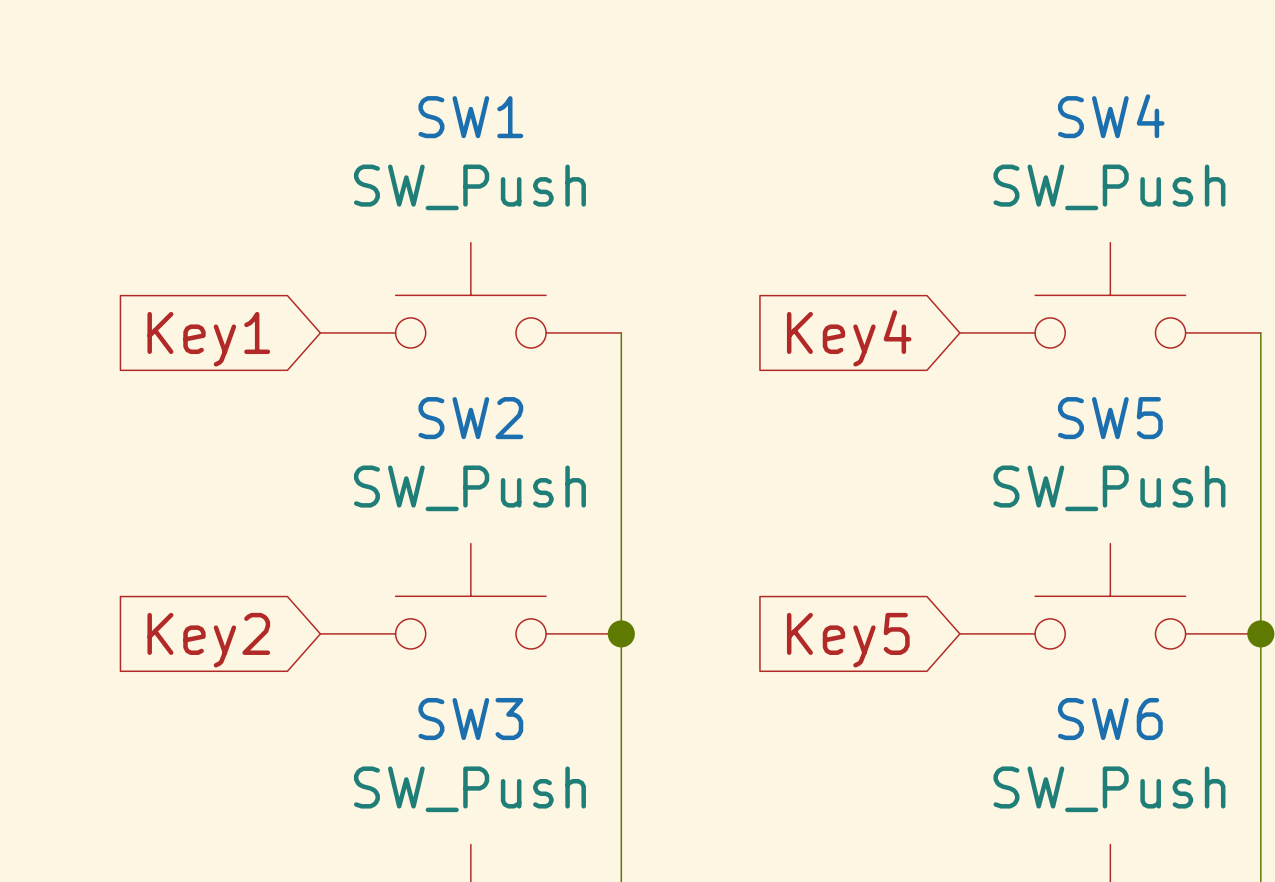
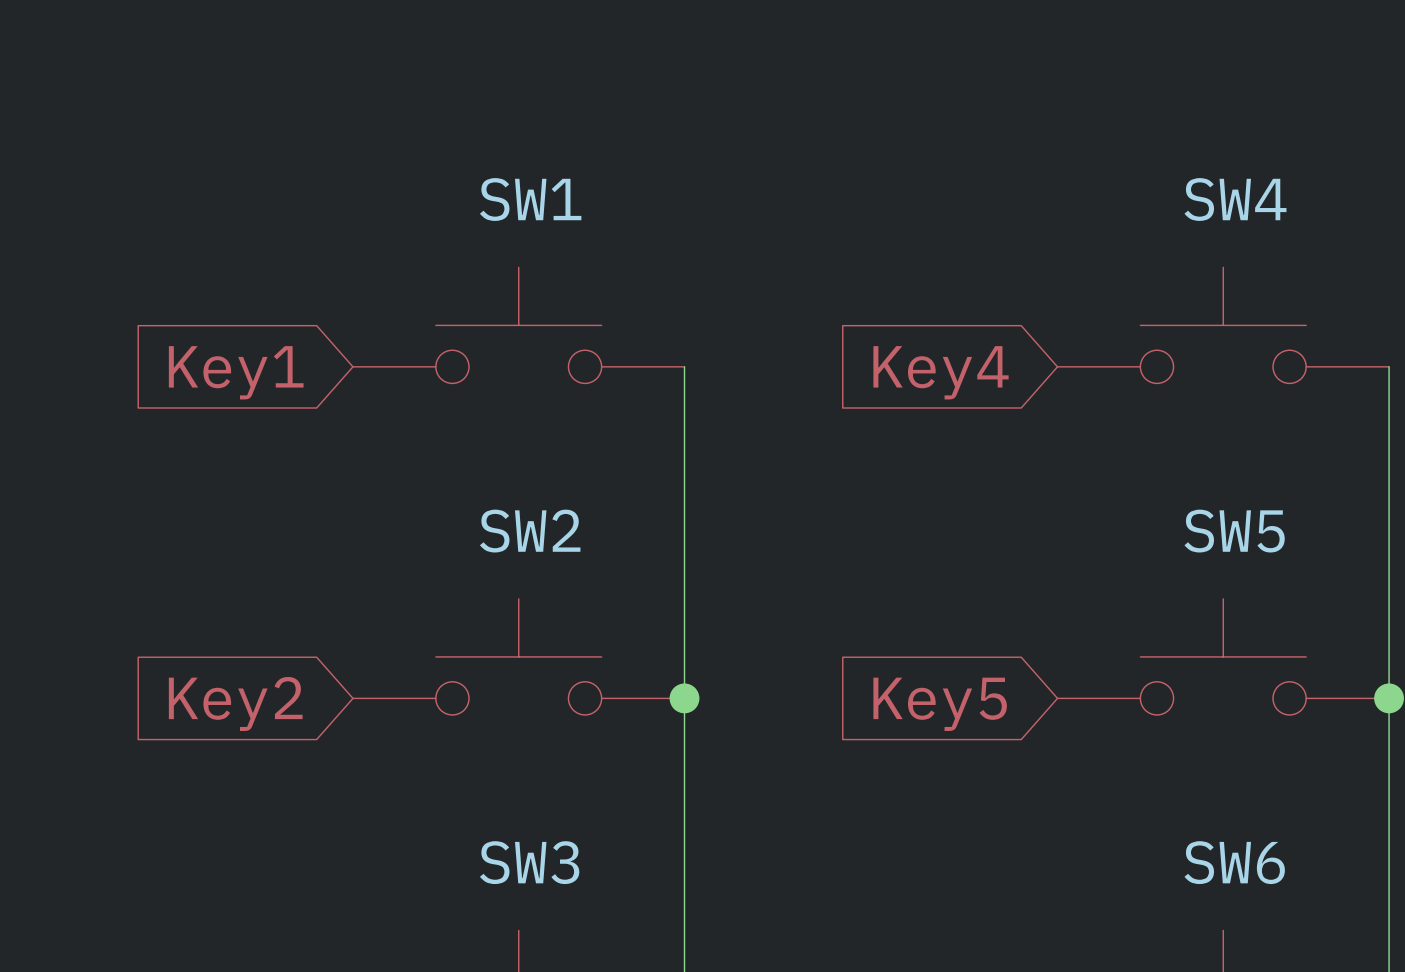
SW4 name position: SW4 (1111, 116) -> SW4 (1235, 199)
SW1 name position: SW1 (470, 117) -> SW1 (530, 199)
SW1 value: SW_Push (469, 187) -> none
SW4 value: SW_Push (1109, 187) -> none
SW2 name position: SW2 (470, 418) -> SW2 (530, 531)
SW5 name position: SW5 (1110, 418) -> SW5 (1234, 531)
SW2 value: SW_Push (469, 488) -> none
SW5 value: SW_Push (1109, 488) -> none
SW3 name position: SW3 (470, 719) -> SW3 (529, 862)
SW6 name position: SW6 (1110, 719) -> SW6 (1234, 862)
SW3 value: SW_Push (469, 789) -> none
SW6 value: SW_Push (1109, 789) -> none

